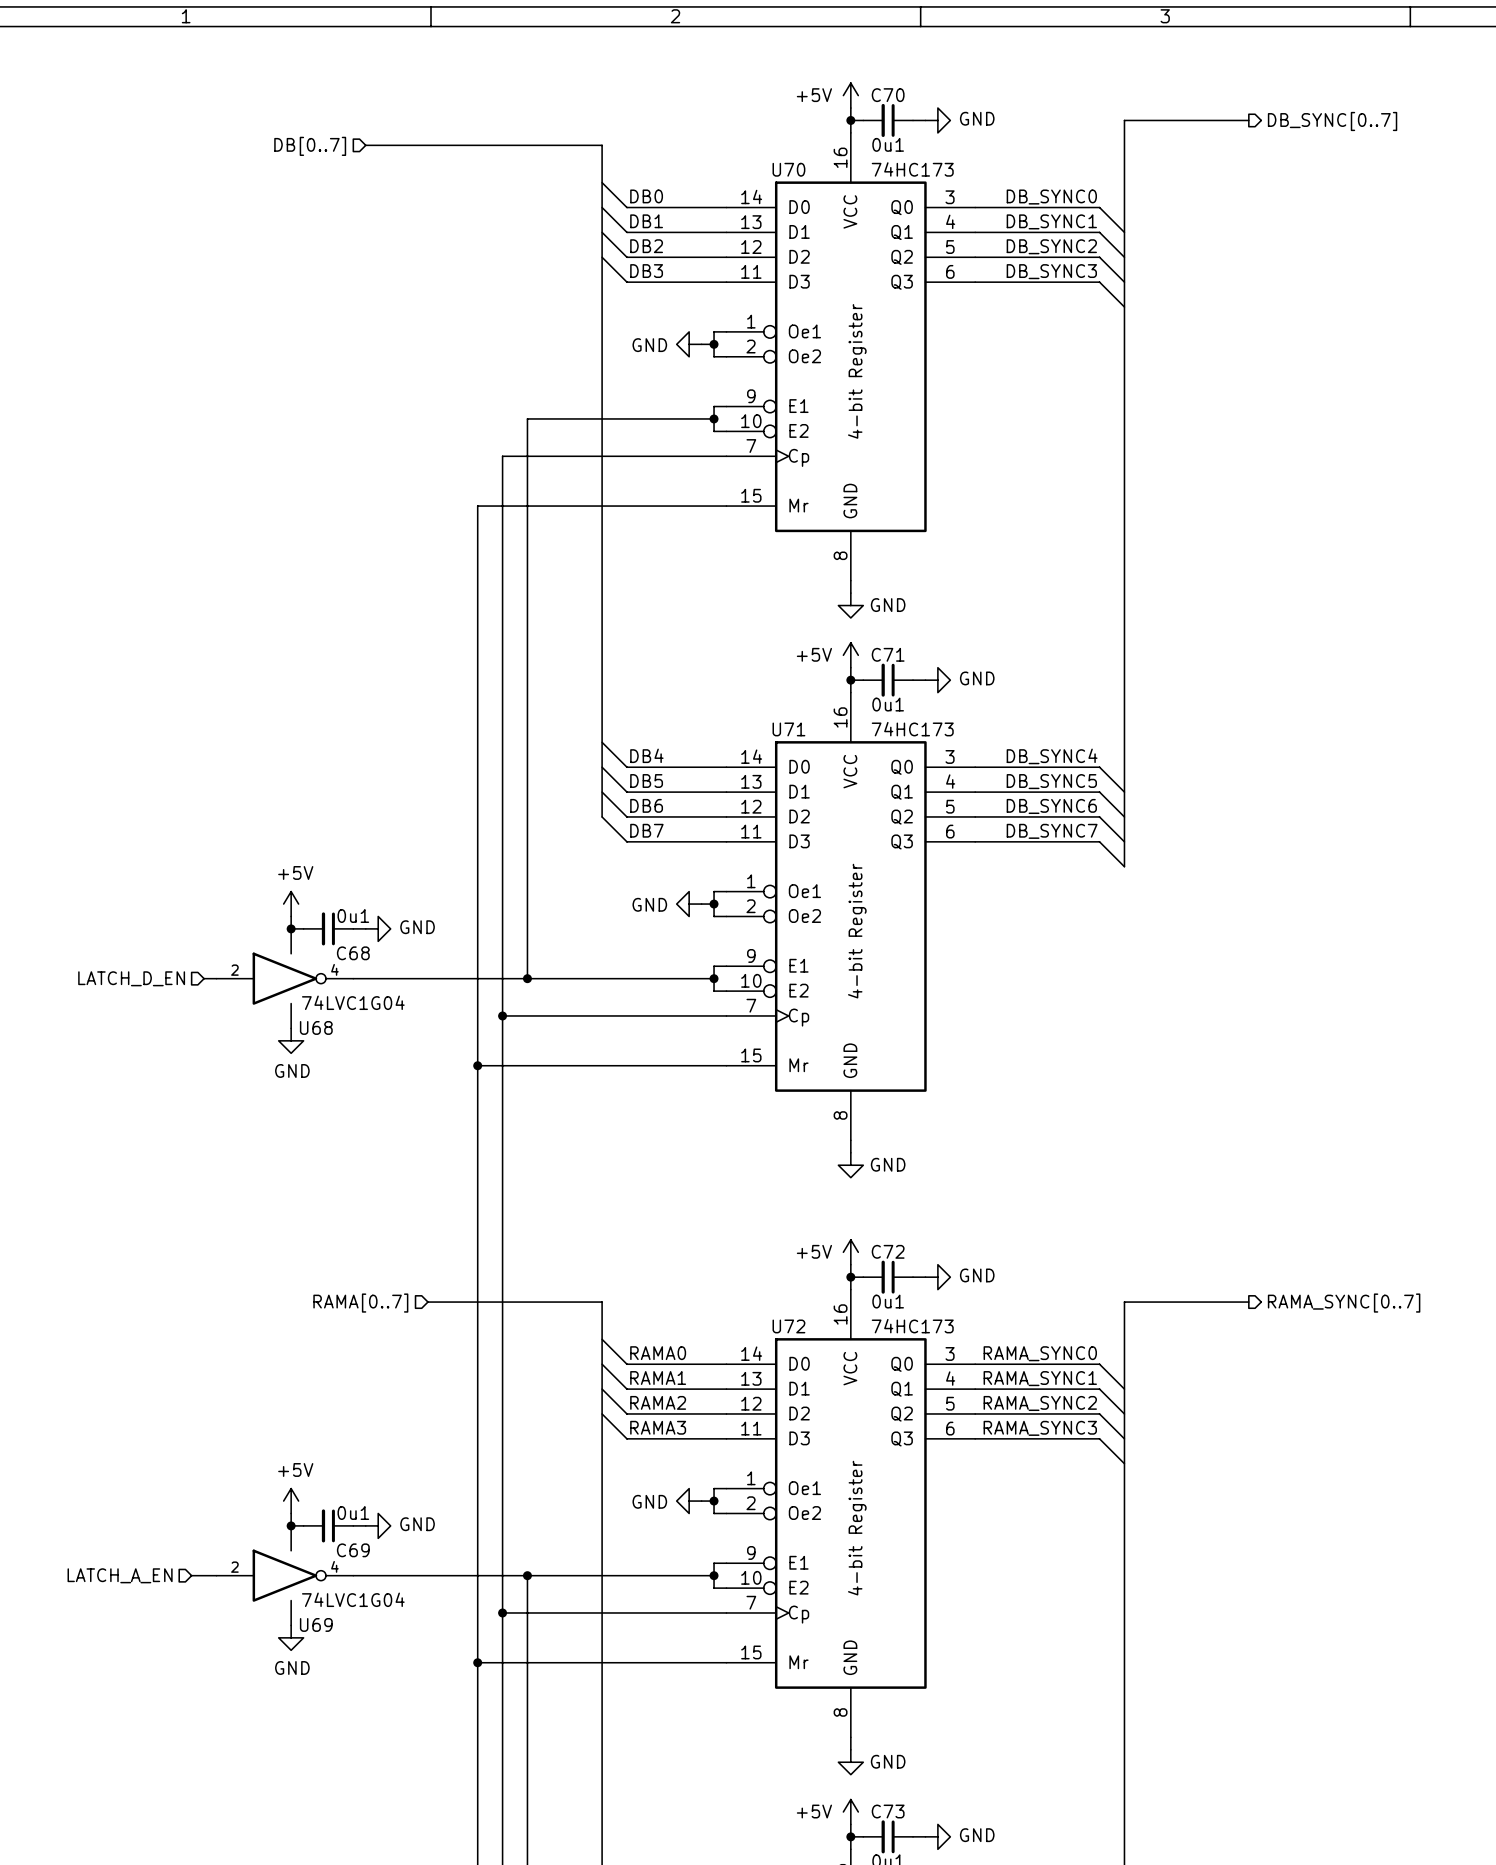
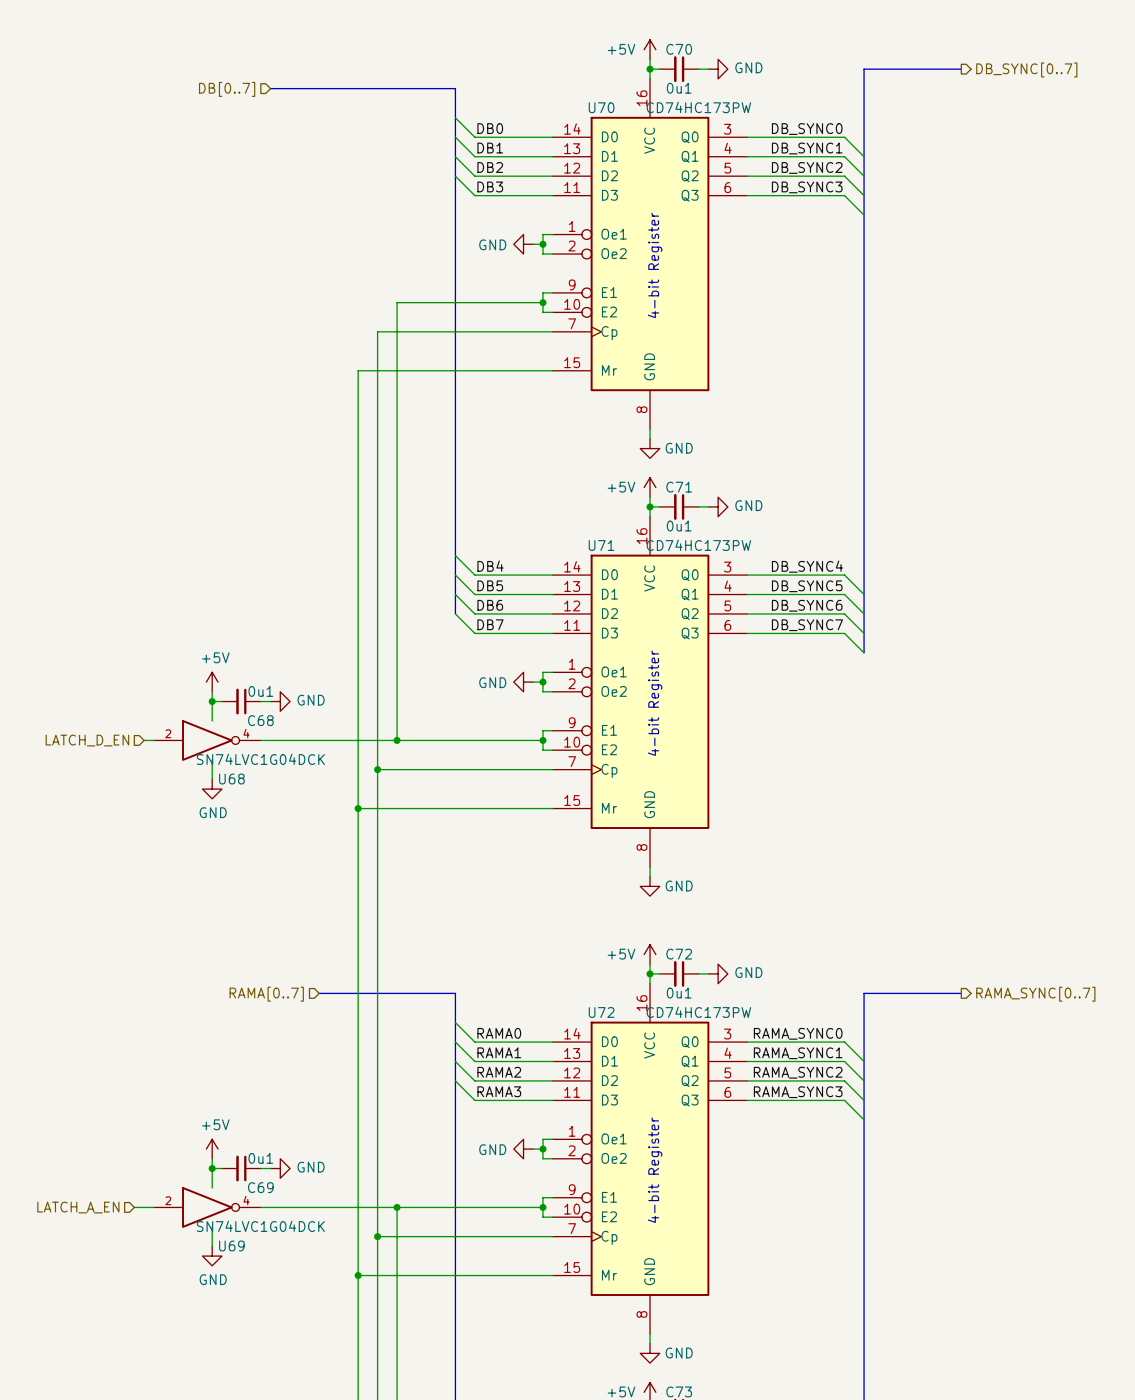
U70 value: 74HC173 (912, 169) -> CD74HC173PW (698, 107)
U71 value: 74HC173 (912, 729) -> CD74HC173PW (698, 545)
U68 value: 74LVC1G04 (353, 1002) -> SN74LVC1G04DCK (260, 759)
U72 value: 74HC173 (912, 1326) -> CD74HC173PW (698, 1012)
U69 value: 74LVC1G04 (353, 1599) -> SN74LVC1G04DCK (260, 1226)

